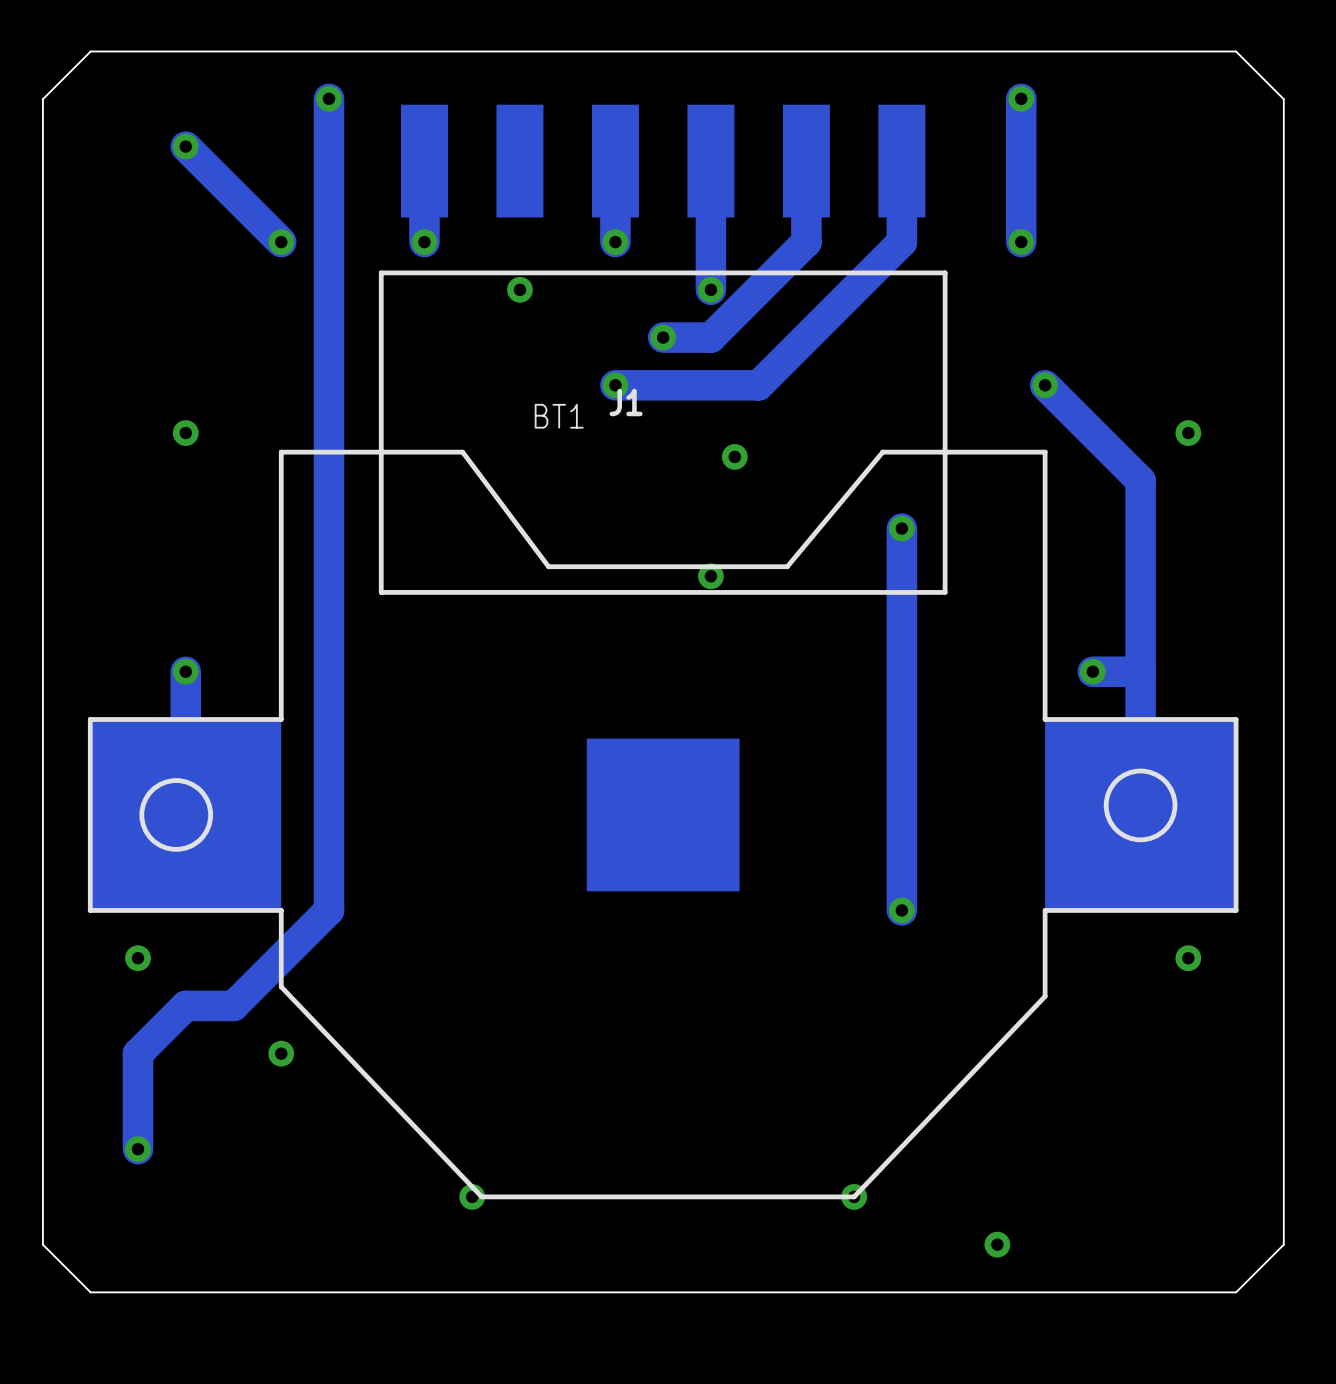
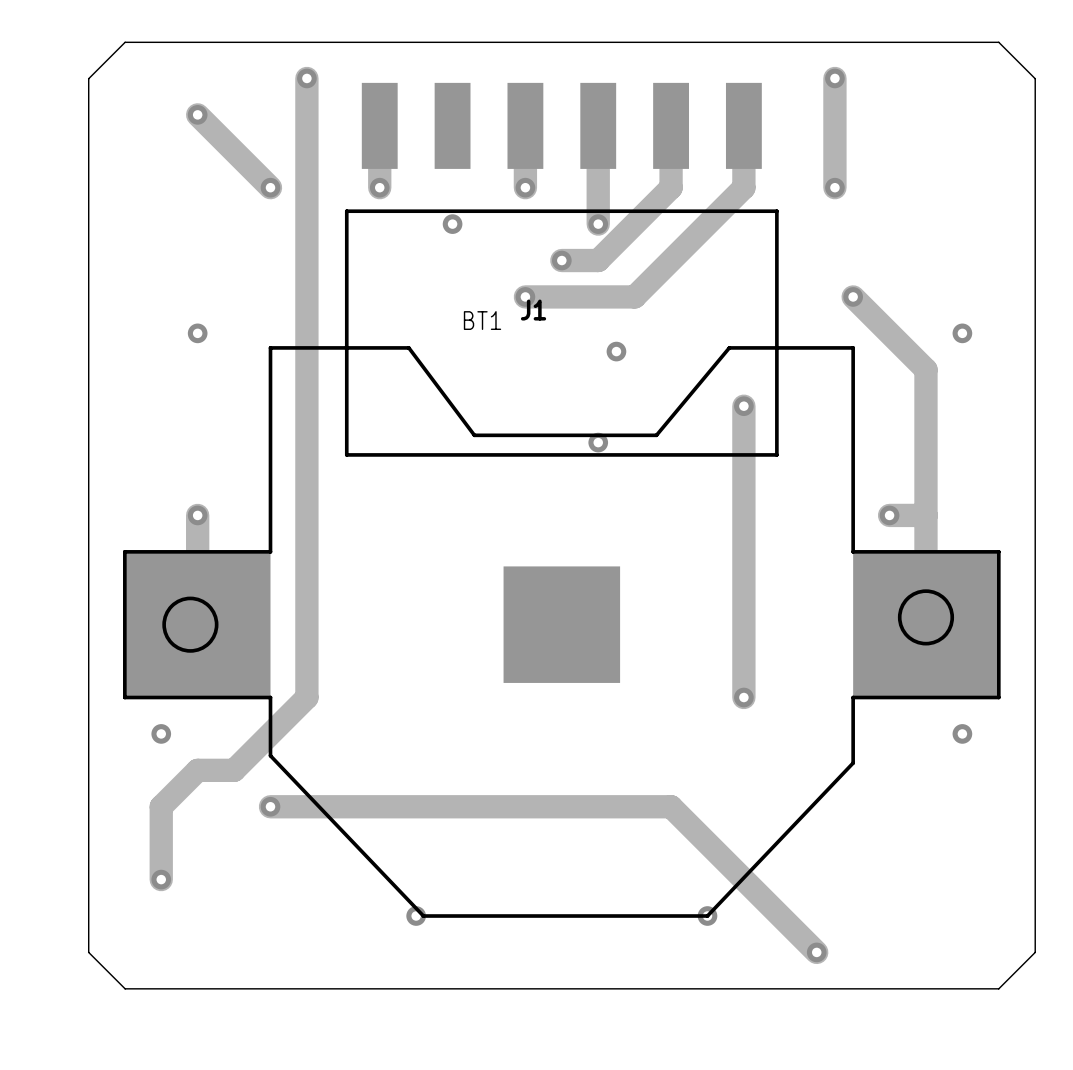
track: none -> (270, 806) (671, 806) (816, 952)

